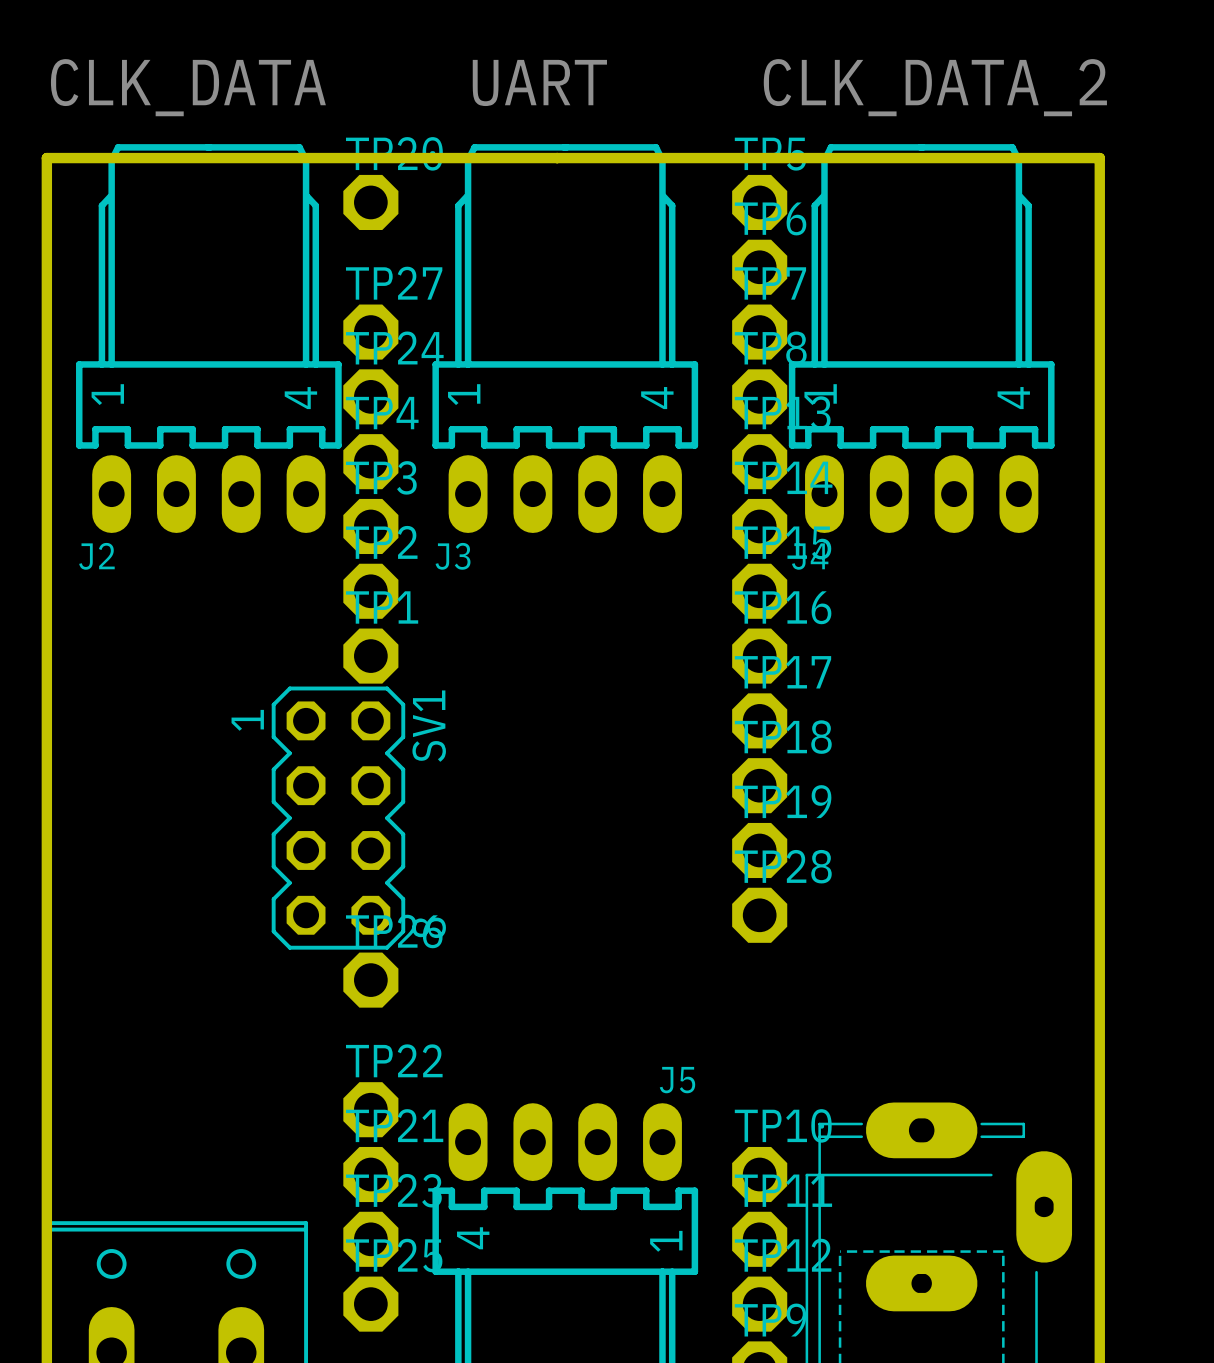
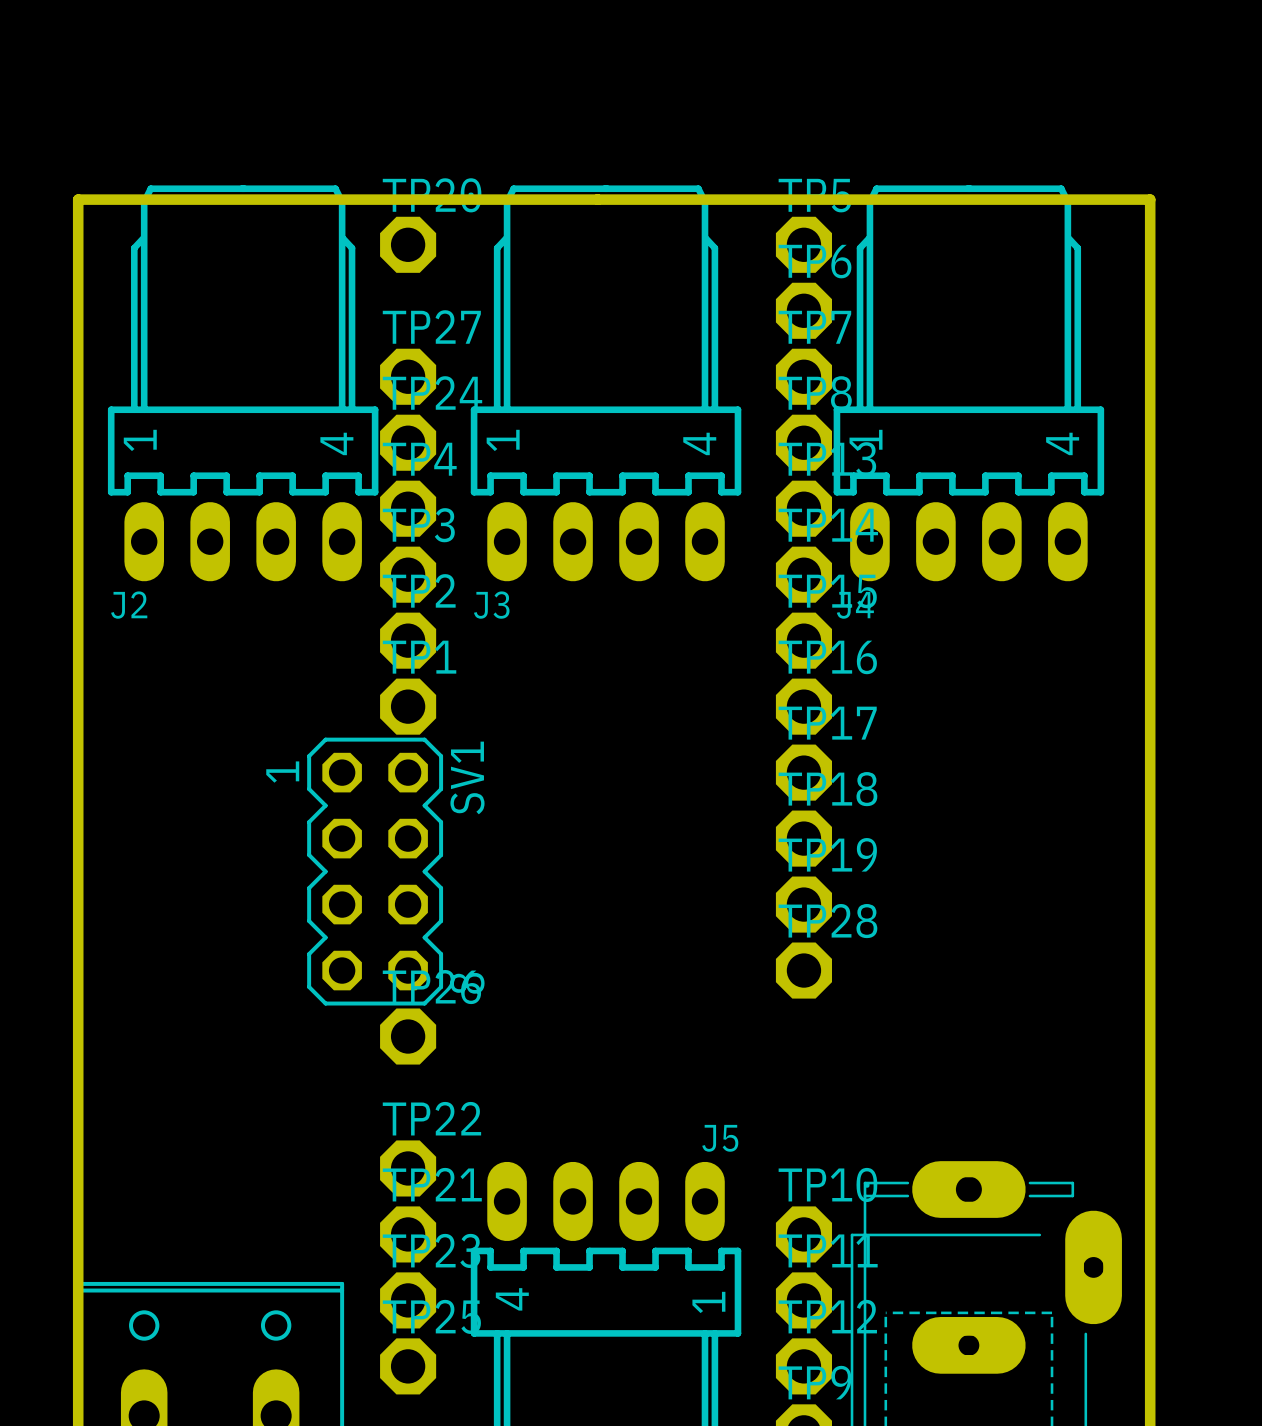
text: UART (539, 82) -> none
text: CLK_DATA (188, 87) -> none
text: CLK_DATA_2 (935, 87) -> none

